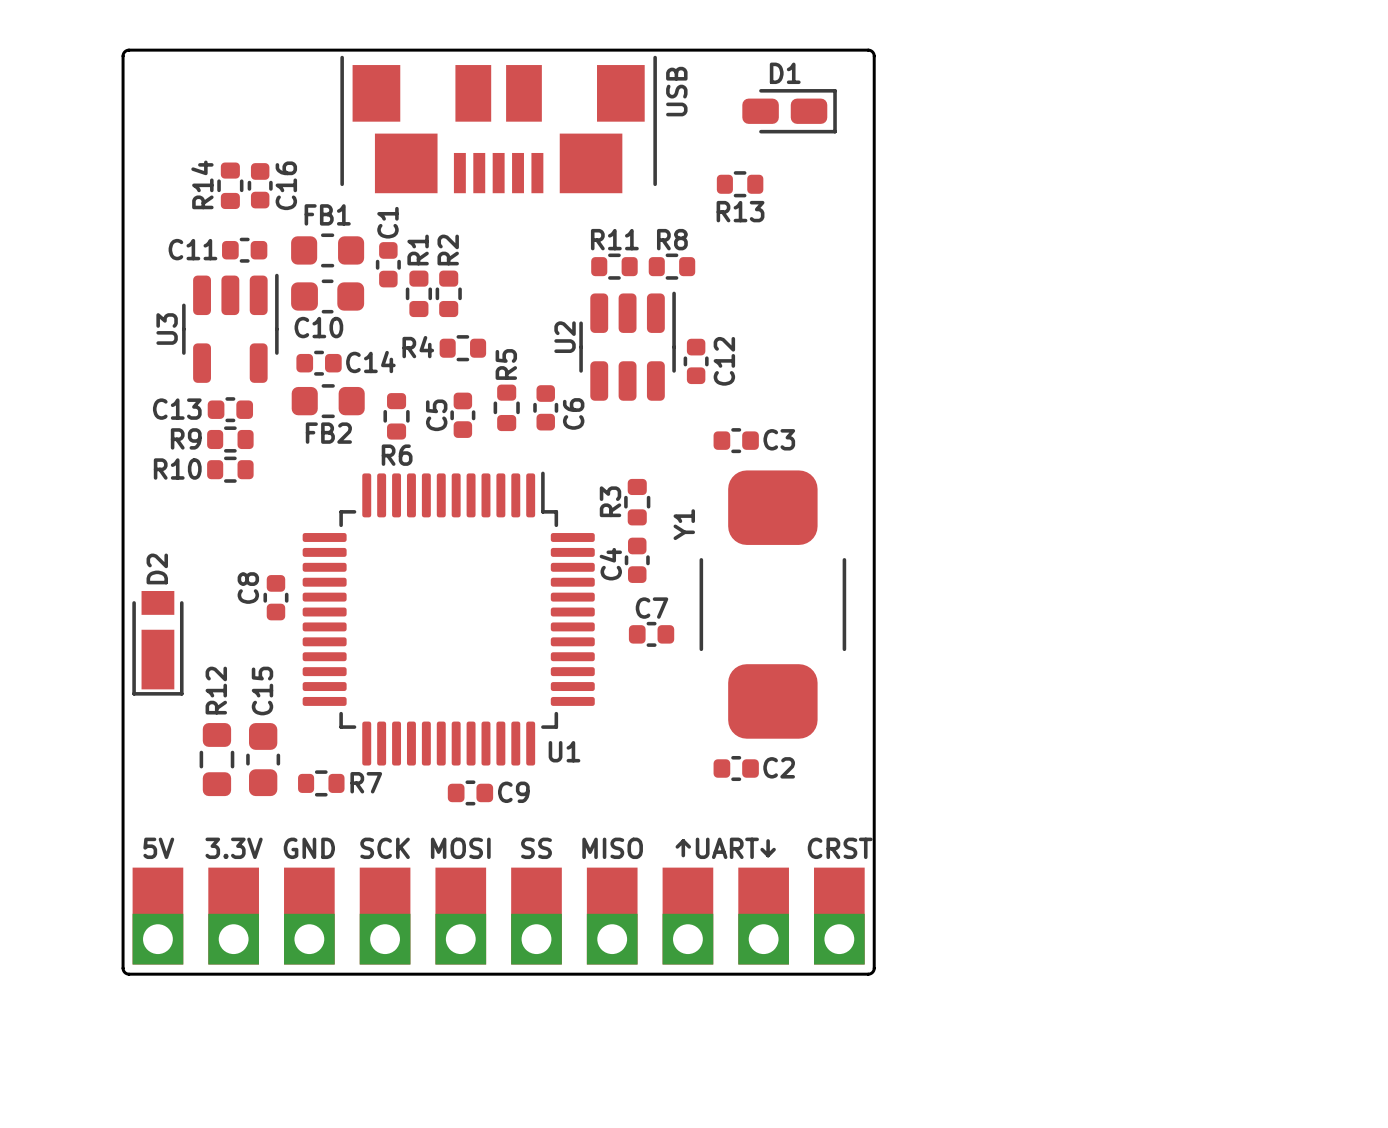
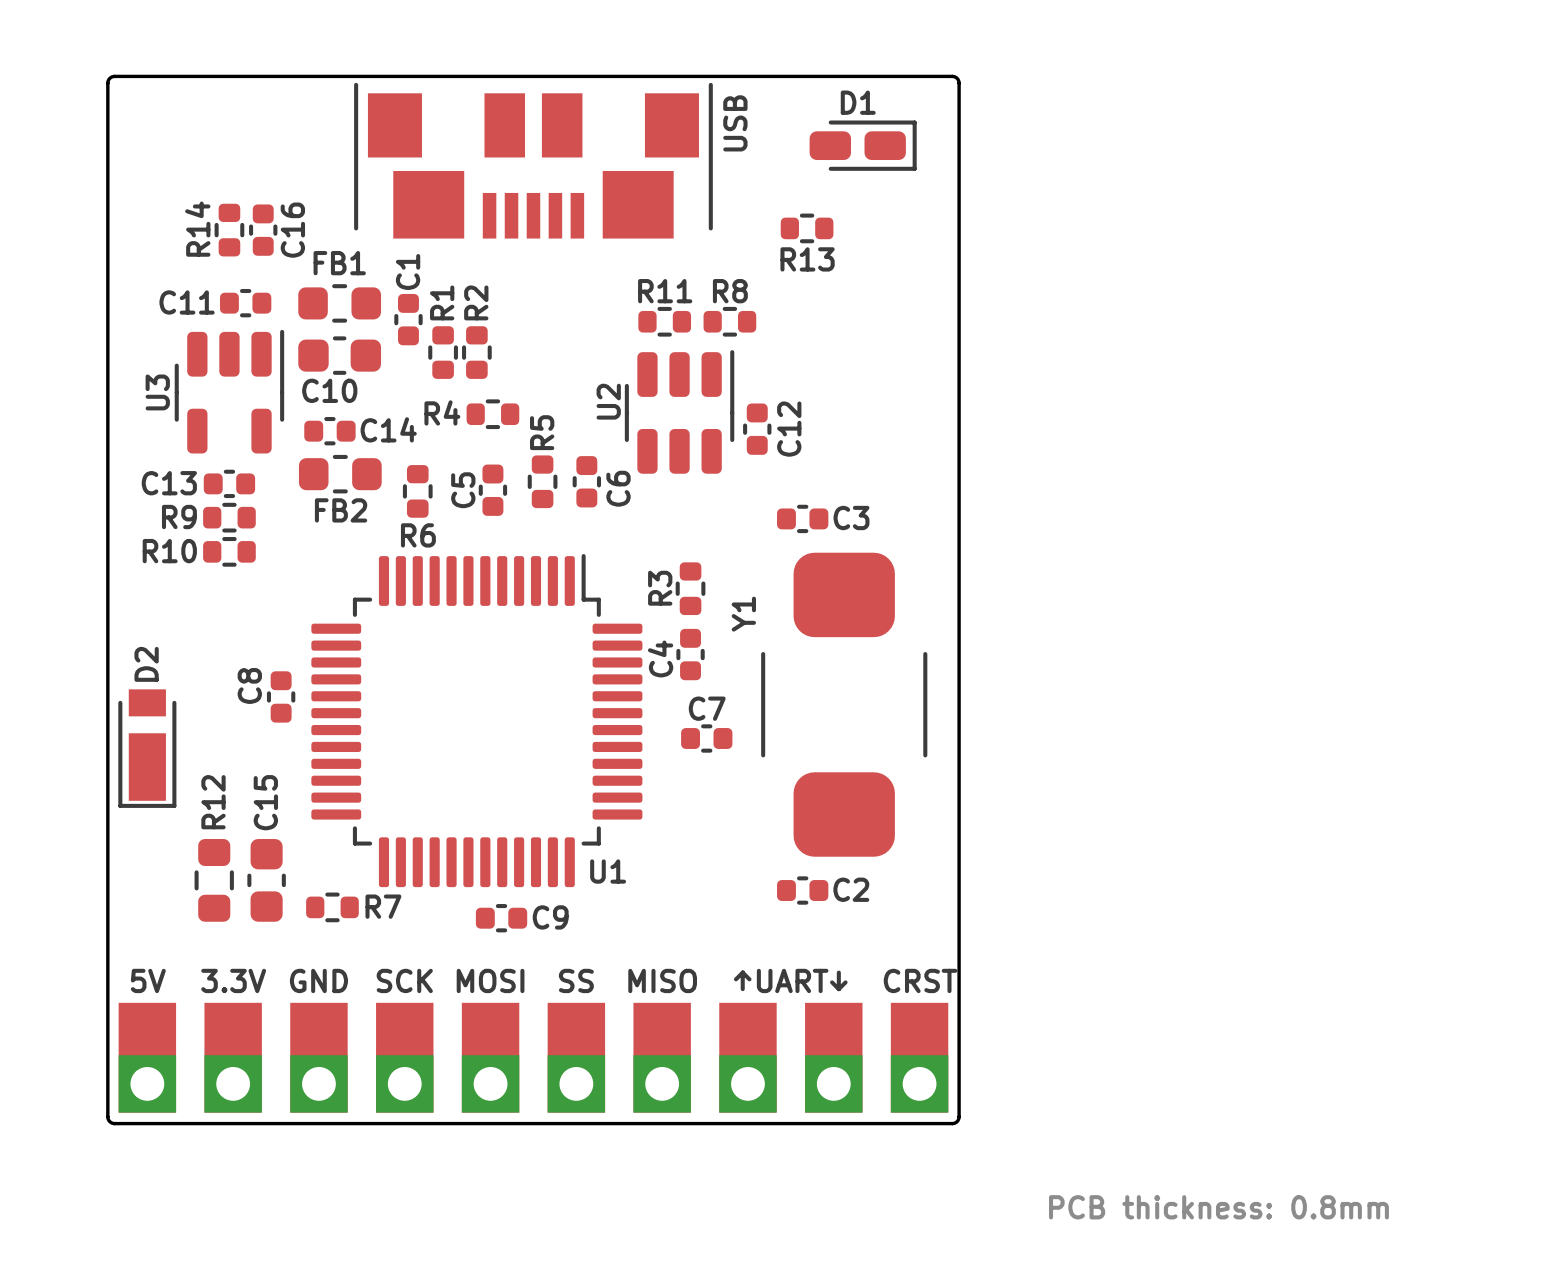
text: none -> PCB thickness: 0.8mm (1218, 1207)

